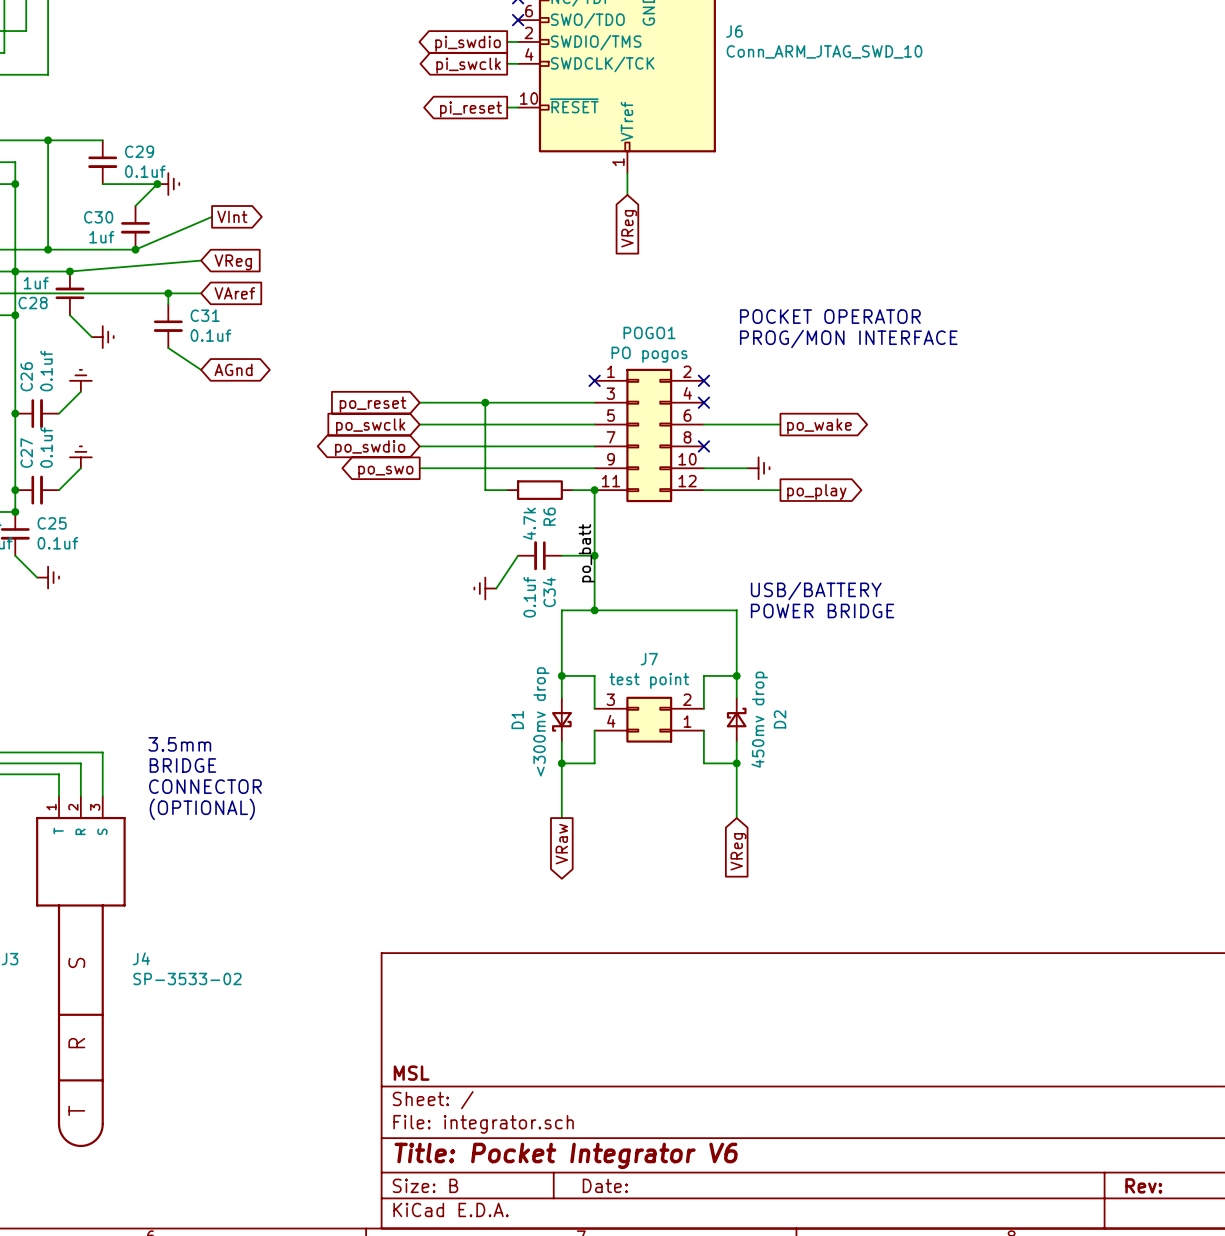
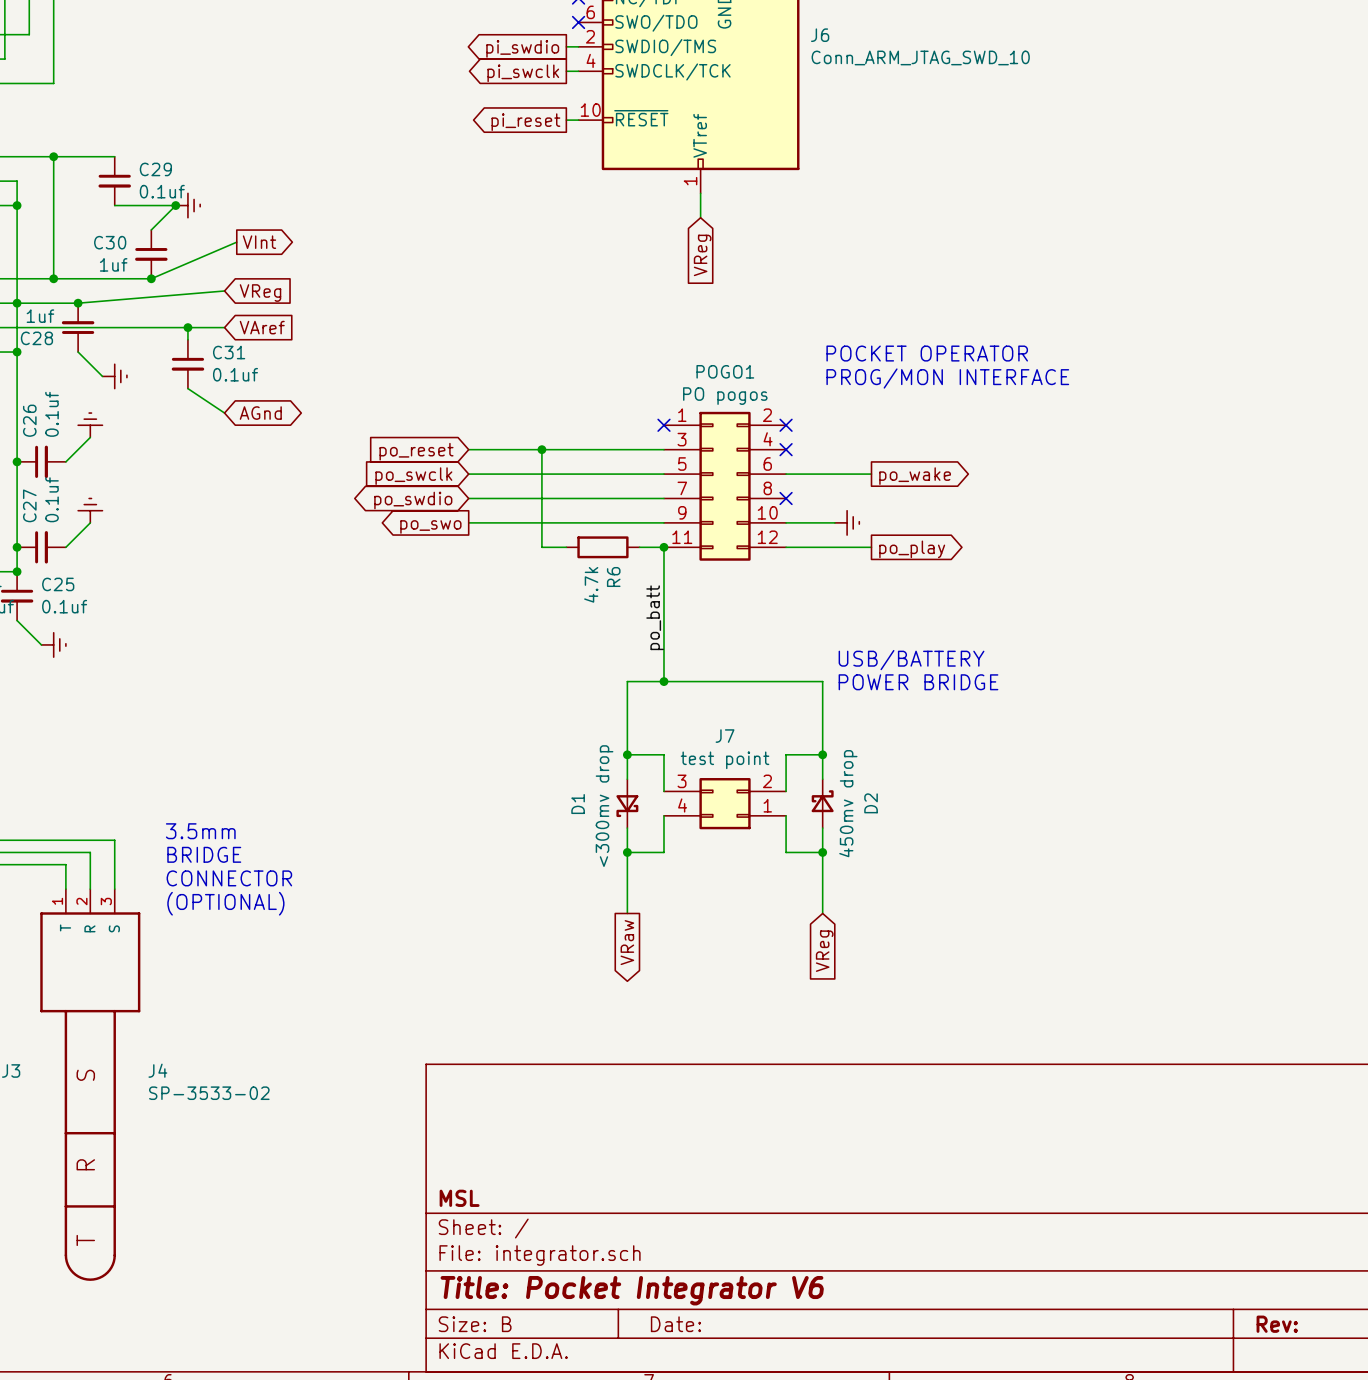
wire: (518, 555) (496, 588) -> none
C34: 0.1uf (539, 555) -> none
wire: (561, 555) (594, 555) -> none
junction: (594, 555) -> none
power symbol: (485, 588) -> none

